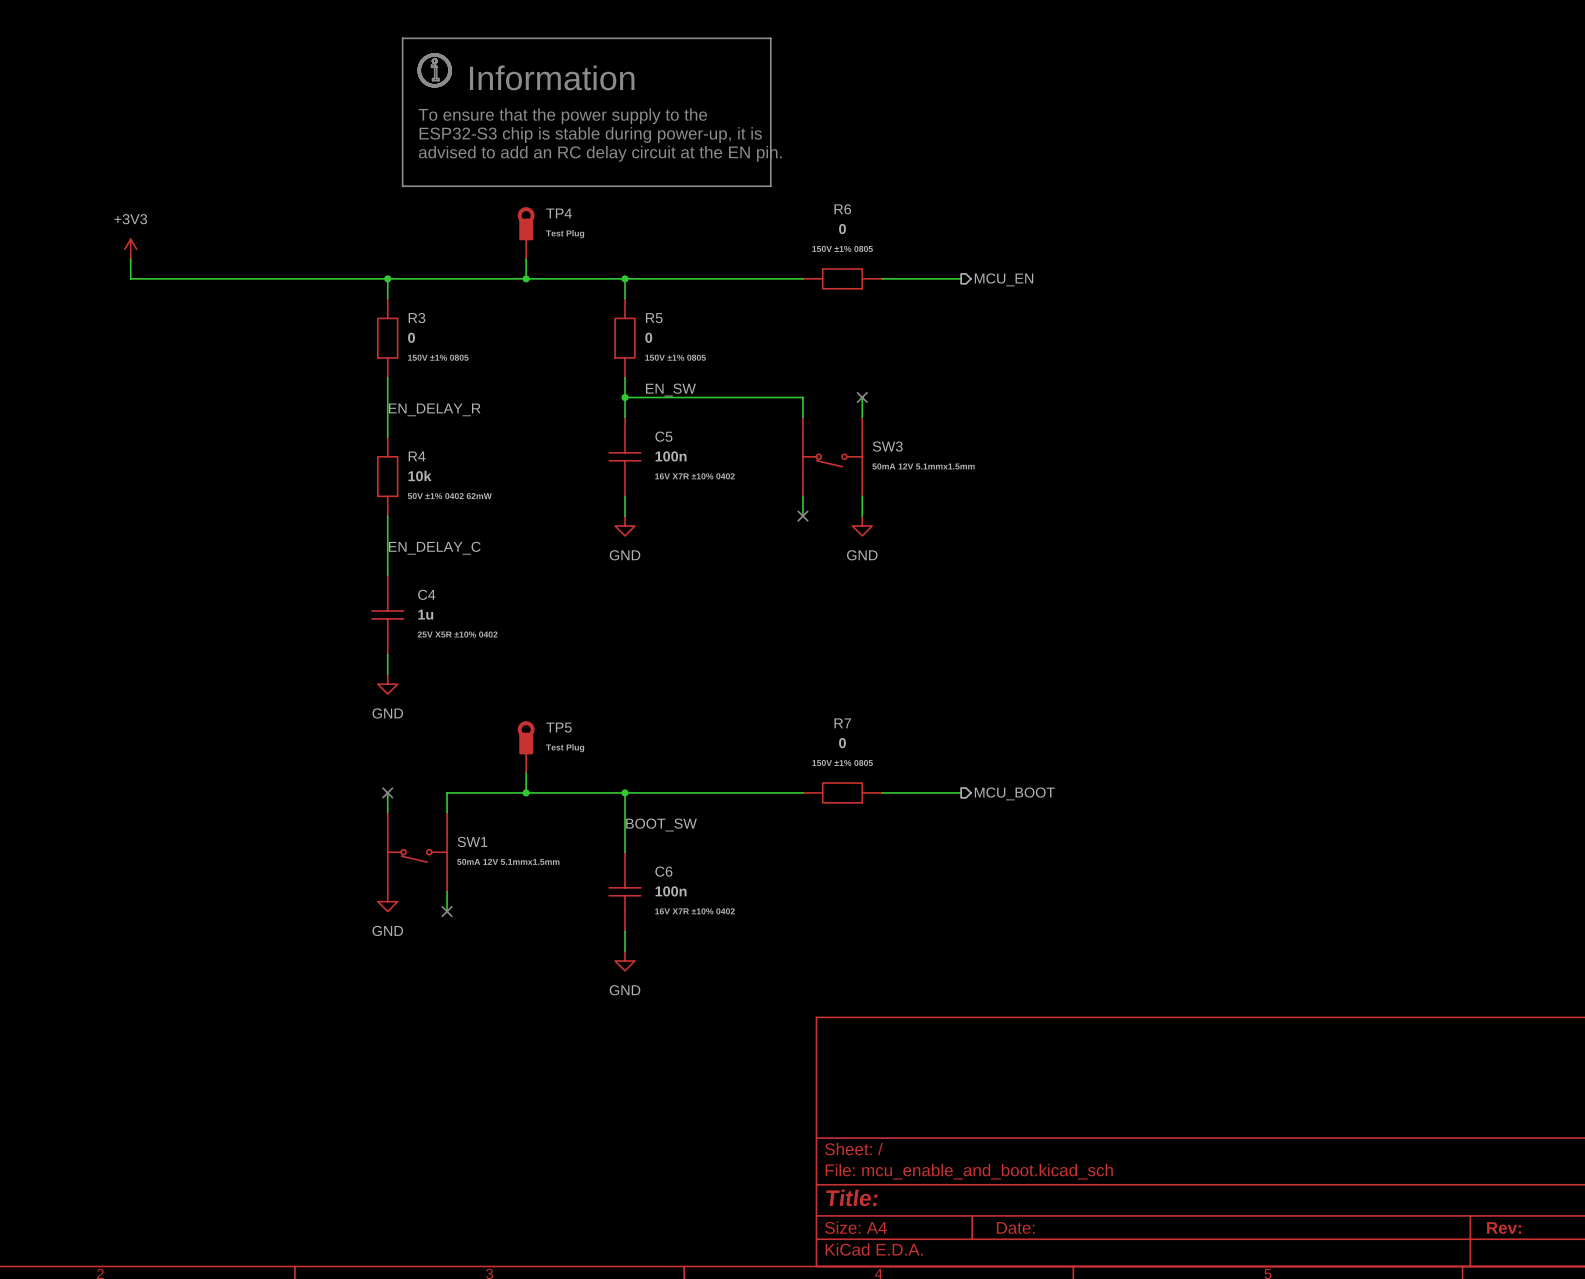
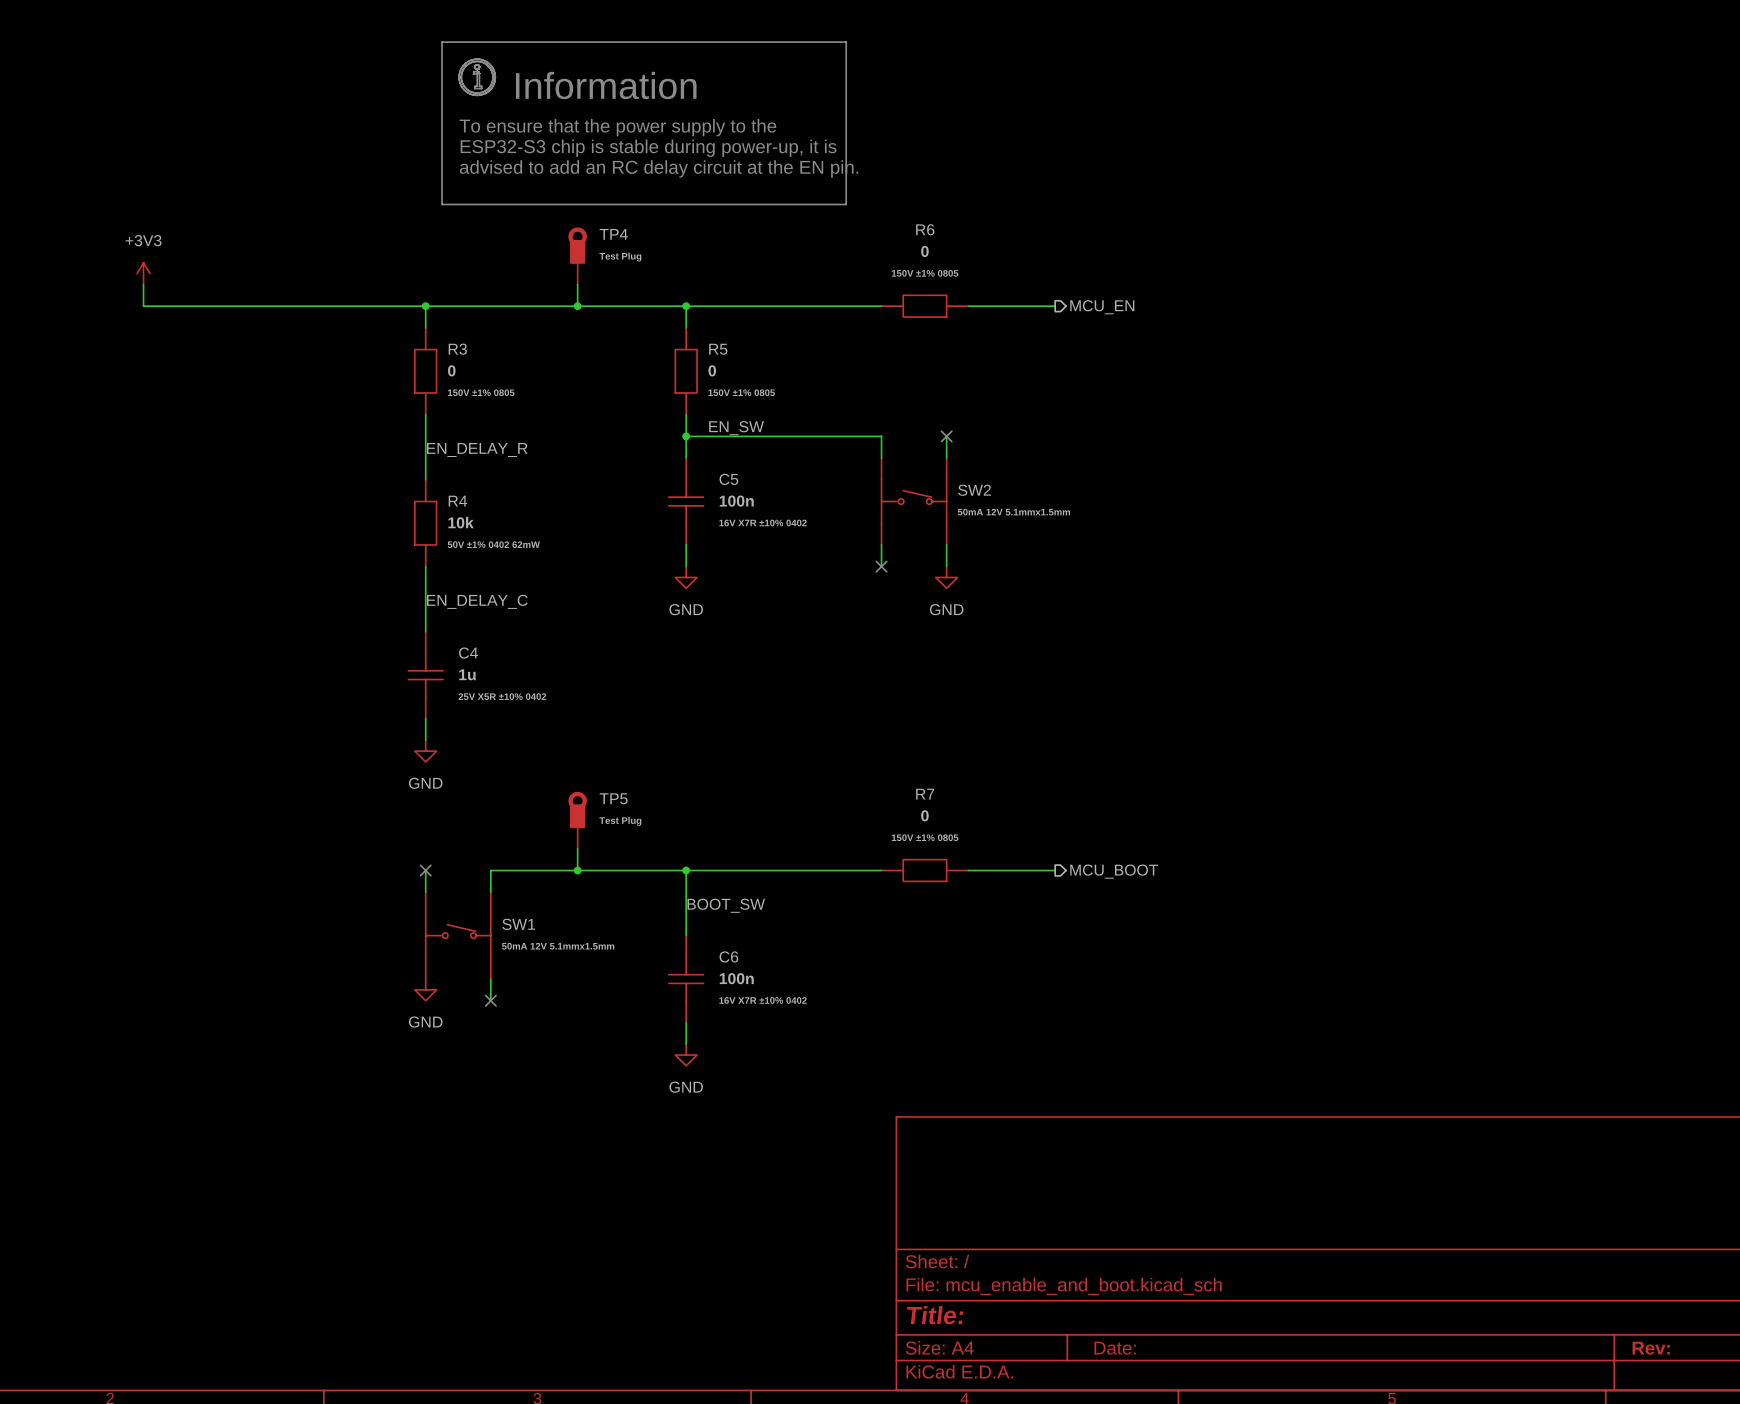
SW3: (832, 456) -> none
SW2: none -> (914, 501)
SW1 rotation: 0° (417, 852) -> 180° (458, 935)

